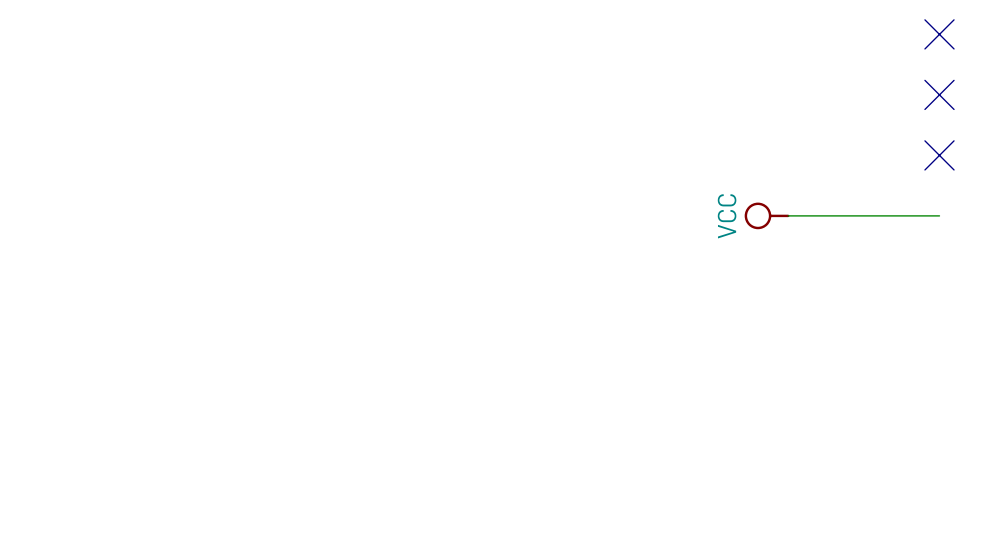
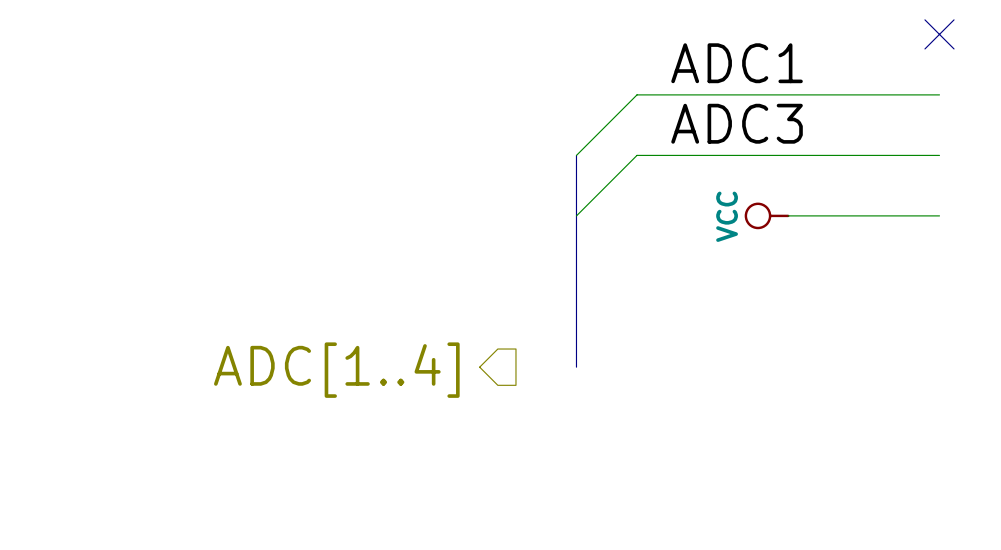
label: none -> ADC1 (737, 63)
wire: none -> (939, 94) (636, 94) (576, 155)
no-connect mark: (939, 94) -> none
label: none -> ADC3 (737, 123)
bus: none -> (576, 155) (576, 367)
wire: none -> (939, 155) (636, 155) (576, 215)
no-connect mark: (939, 155) -> none
hierarchical label: none -> ADC[1..4] (336, 370)

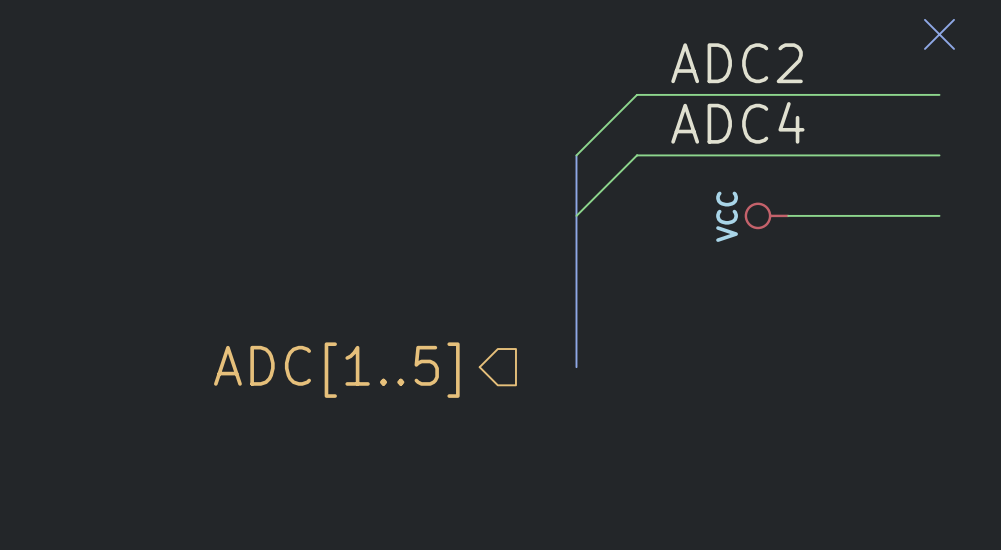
label: ADC1 (737, 63) -> ADC2 (737, 63)
label: ADC3 (737, 123) -> ADC4 (737, 122)
hierarchical label: ADC[1..4] (336, 370) -> ADC[1..5] (336, 370)

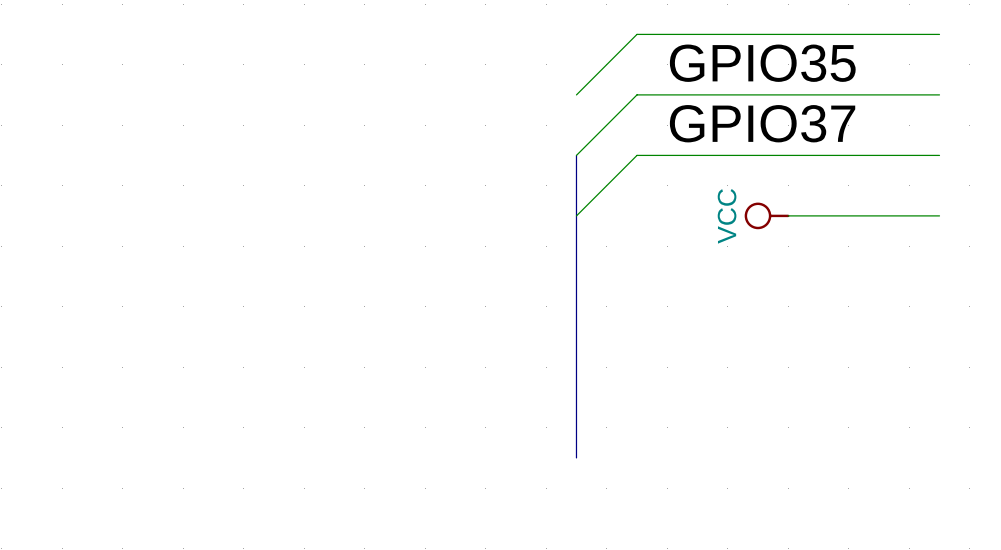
wire: none -> (939, 34) (636, 34) (576, 94)
no-connect mark: (939, 34) -> none
label: ADC2 (737, 63) -> GPIO35 (762, 63)
label: ADC4 (737, 122) -> GPIO37 (762, 123)
bus: none -> (576, 367) (576, 457)
hierarchical label: ADC[1..5] (336, 370) -> none

